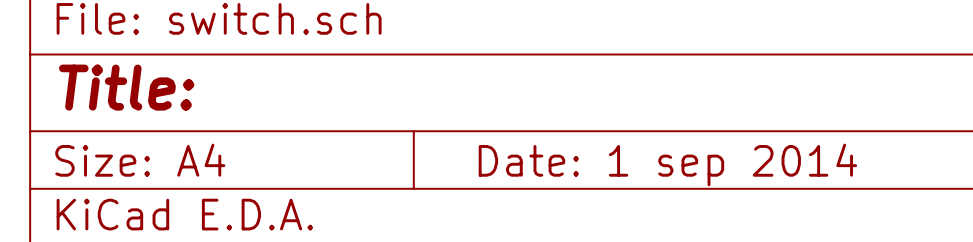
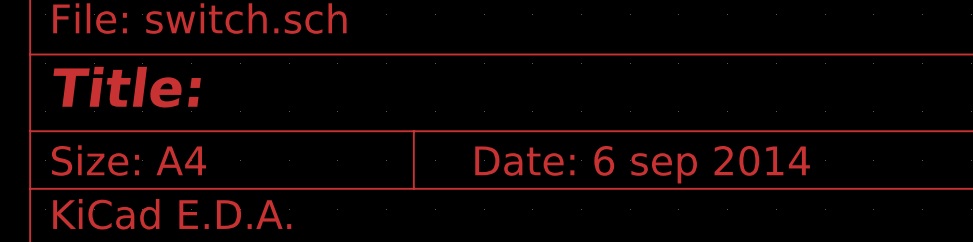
title block: Date: 1 sep 2014 (667, 164) -> Date: 6 sep 2014 (642, 164)

